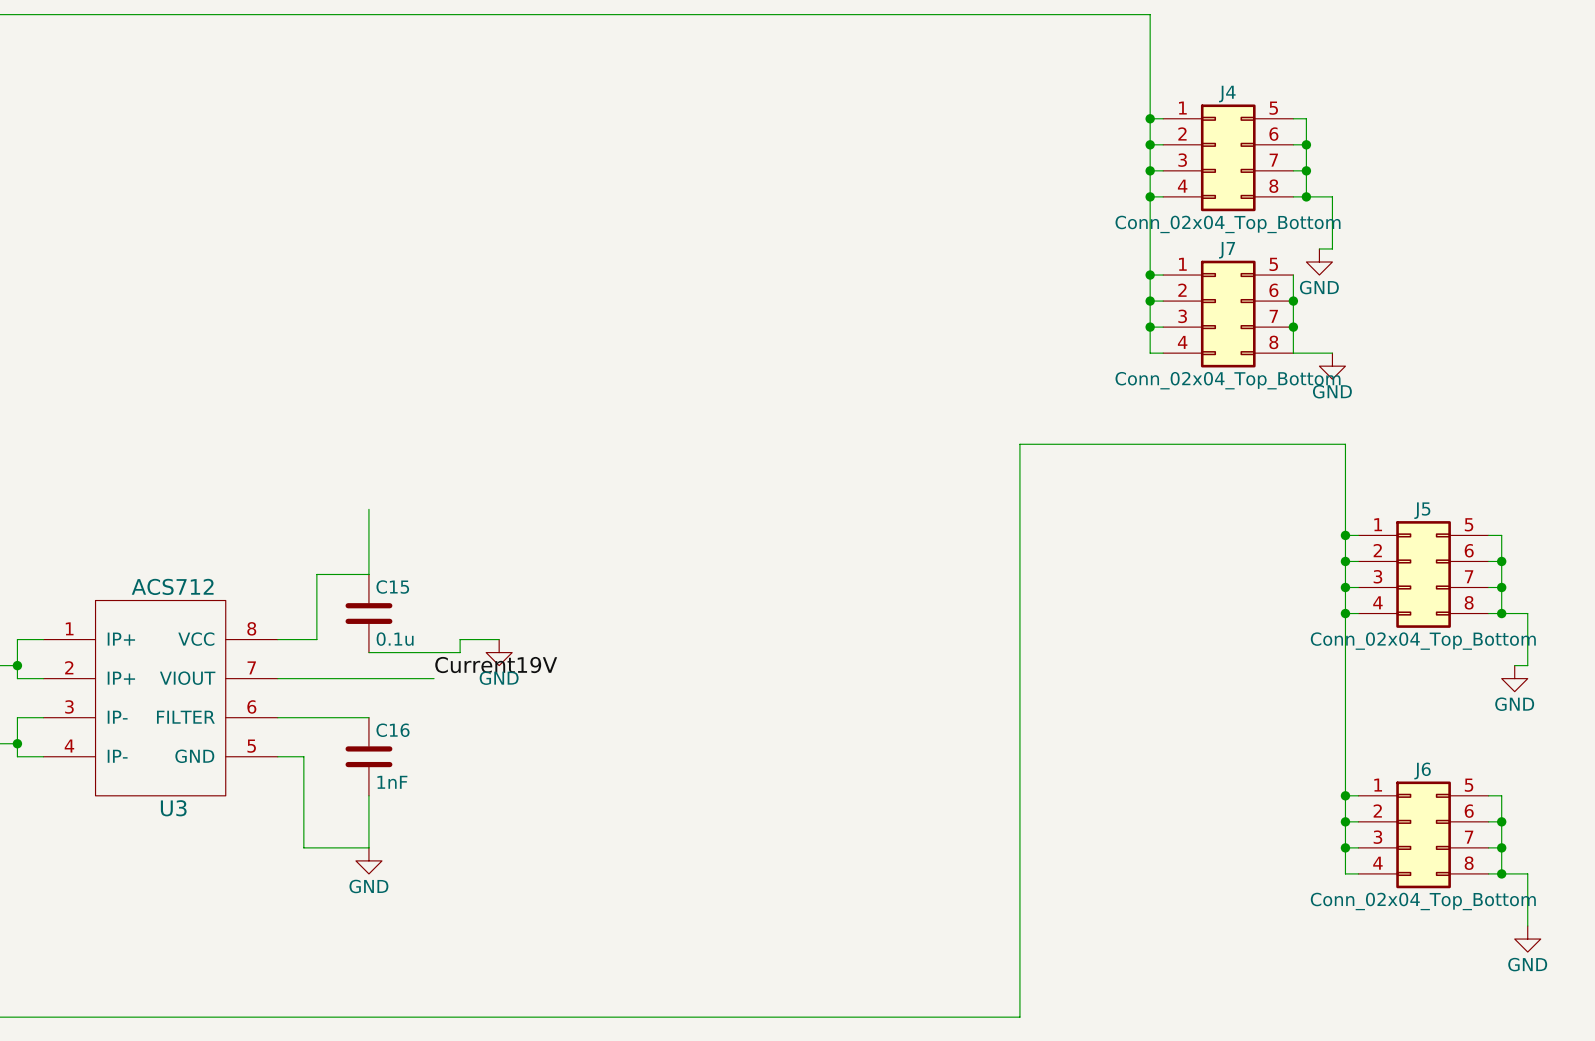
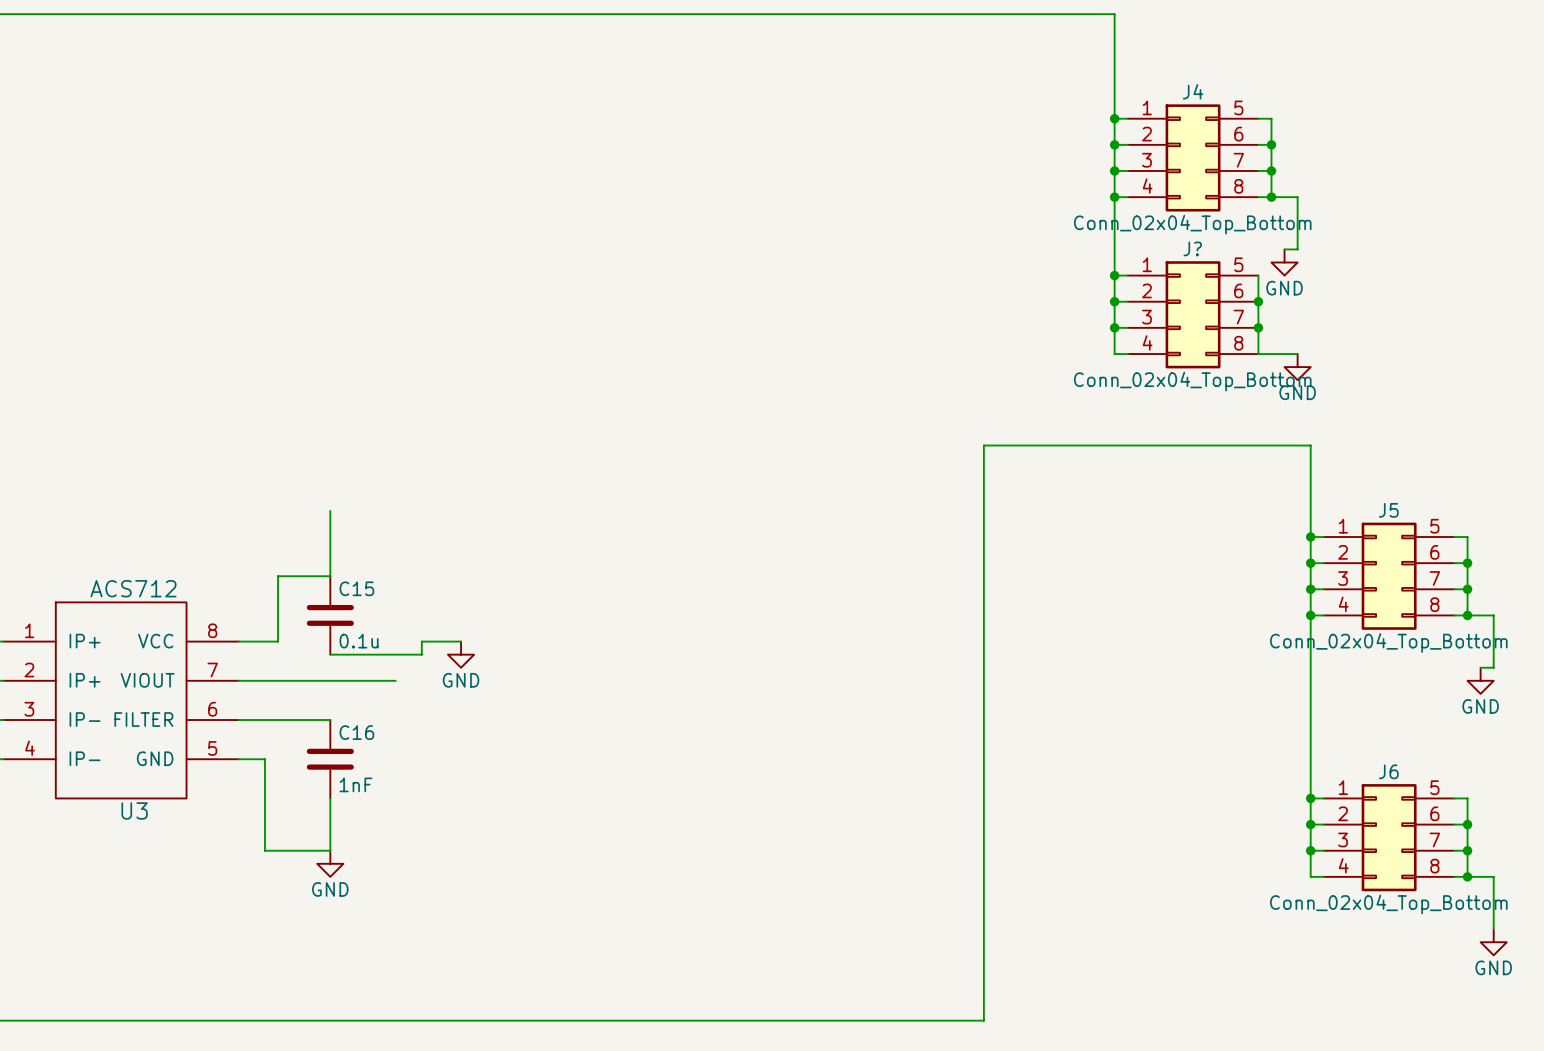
J7 name: J7 (1227, 250) -> J? (1192, 248)
label: Current19V (496, 665) -> none

